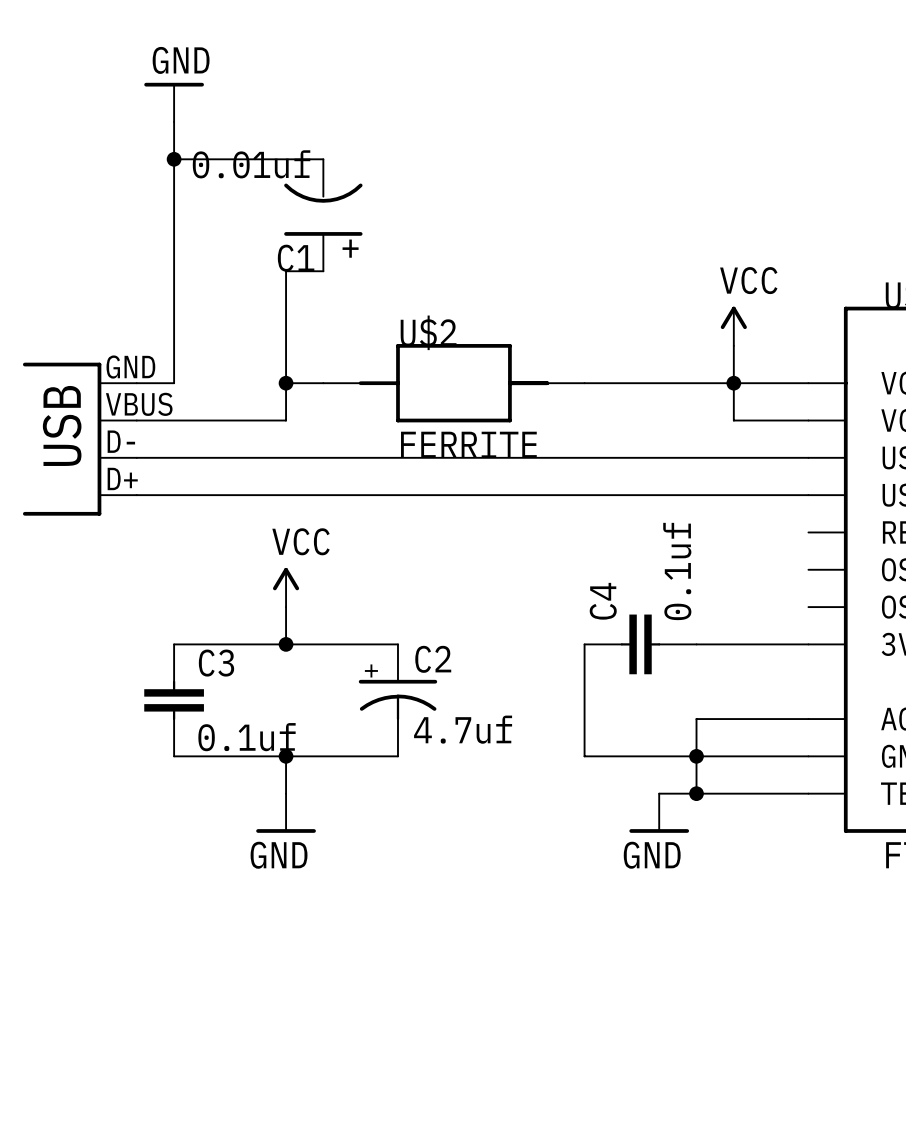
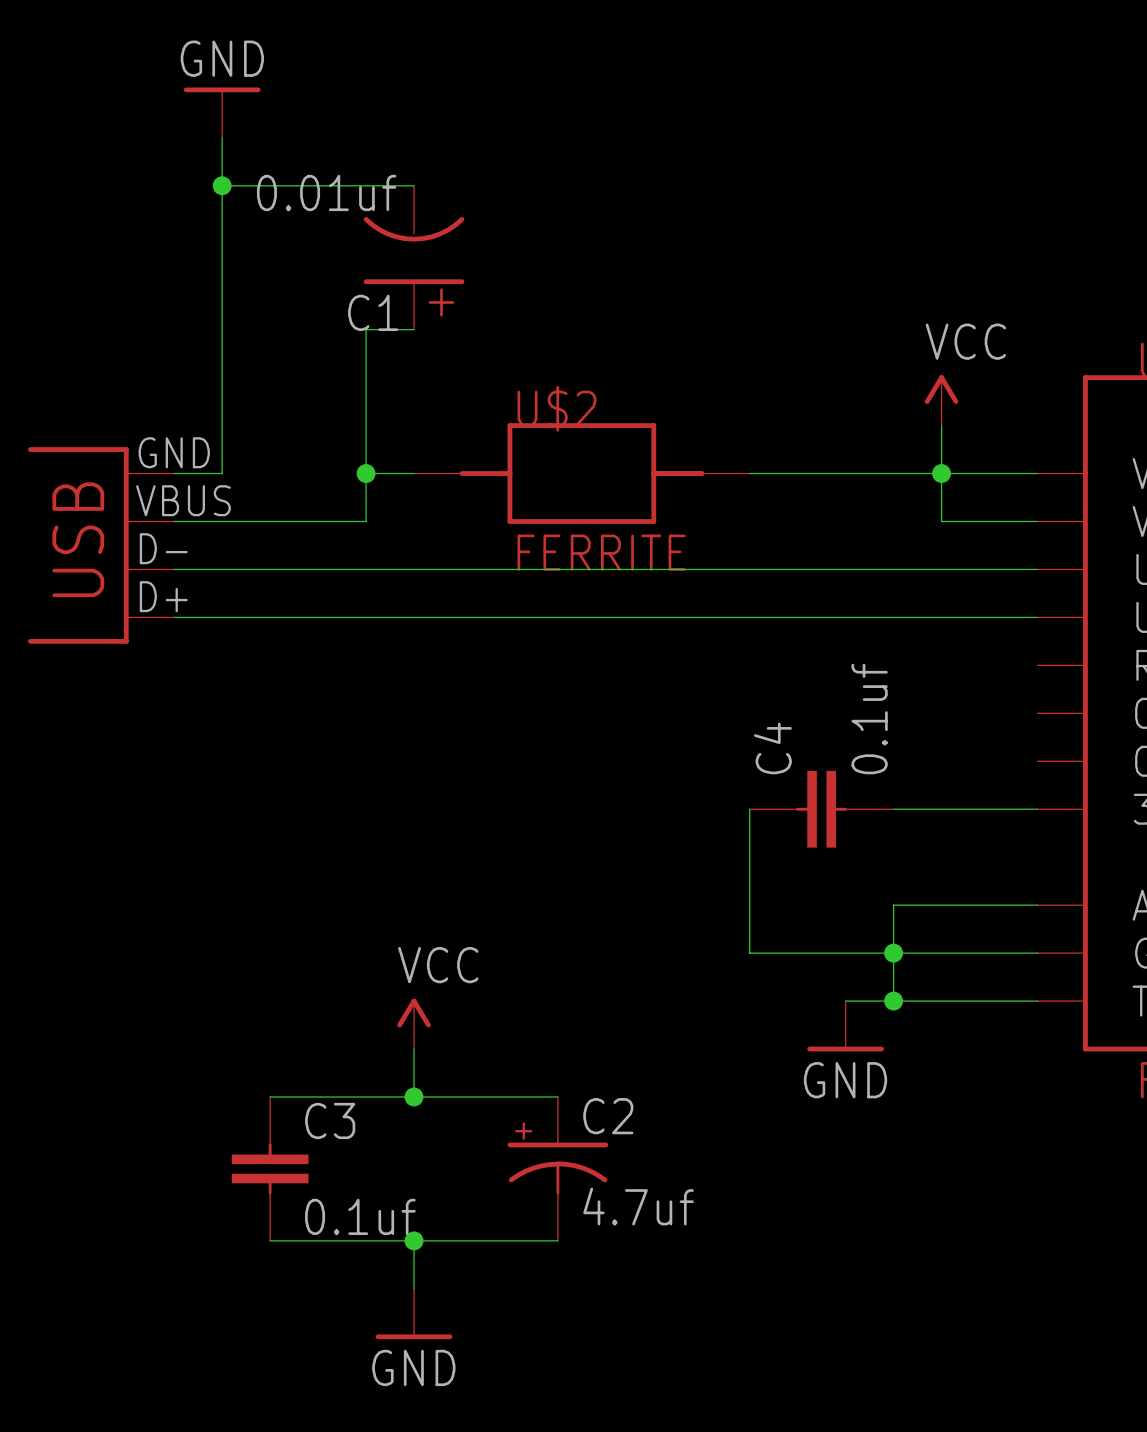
power symbol position: VCC (286, 587) -> VCC (414, 1023)
wire: (286, 607) (286, 644) -> (414, 1049) (414, 1096)
wire: (174, 644) (397, 644) -> (270, 1096) (557, 1096)
junction: (286, 644) -> none
C3 position: (174, 700) -> (270, 1168)
C2 position: (397, 700) -> (557, 1168)
wire: (174, 756) (397, 756) -> (270, 1240) (557, 1240)
wire: (286, 756) (286, 793) -> (414, 1240) (414, 1288)
junction: (286, 756) -> none
power symbol position: GND (286, 813) -> GND (414, 1314)
junction: none -> (414, 1096)
junction: none -> (414, 1240)

